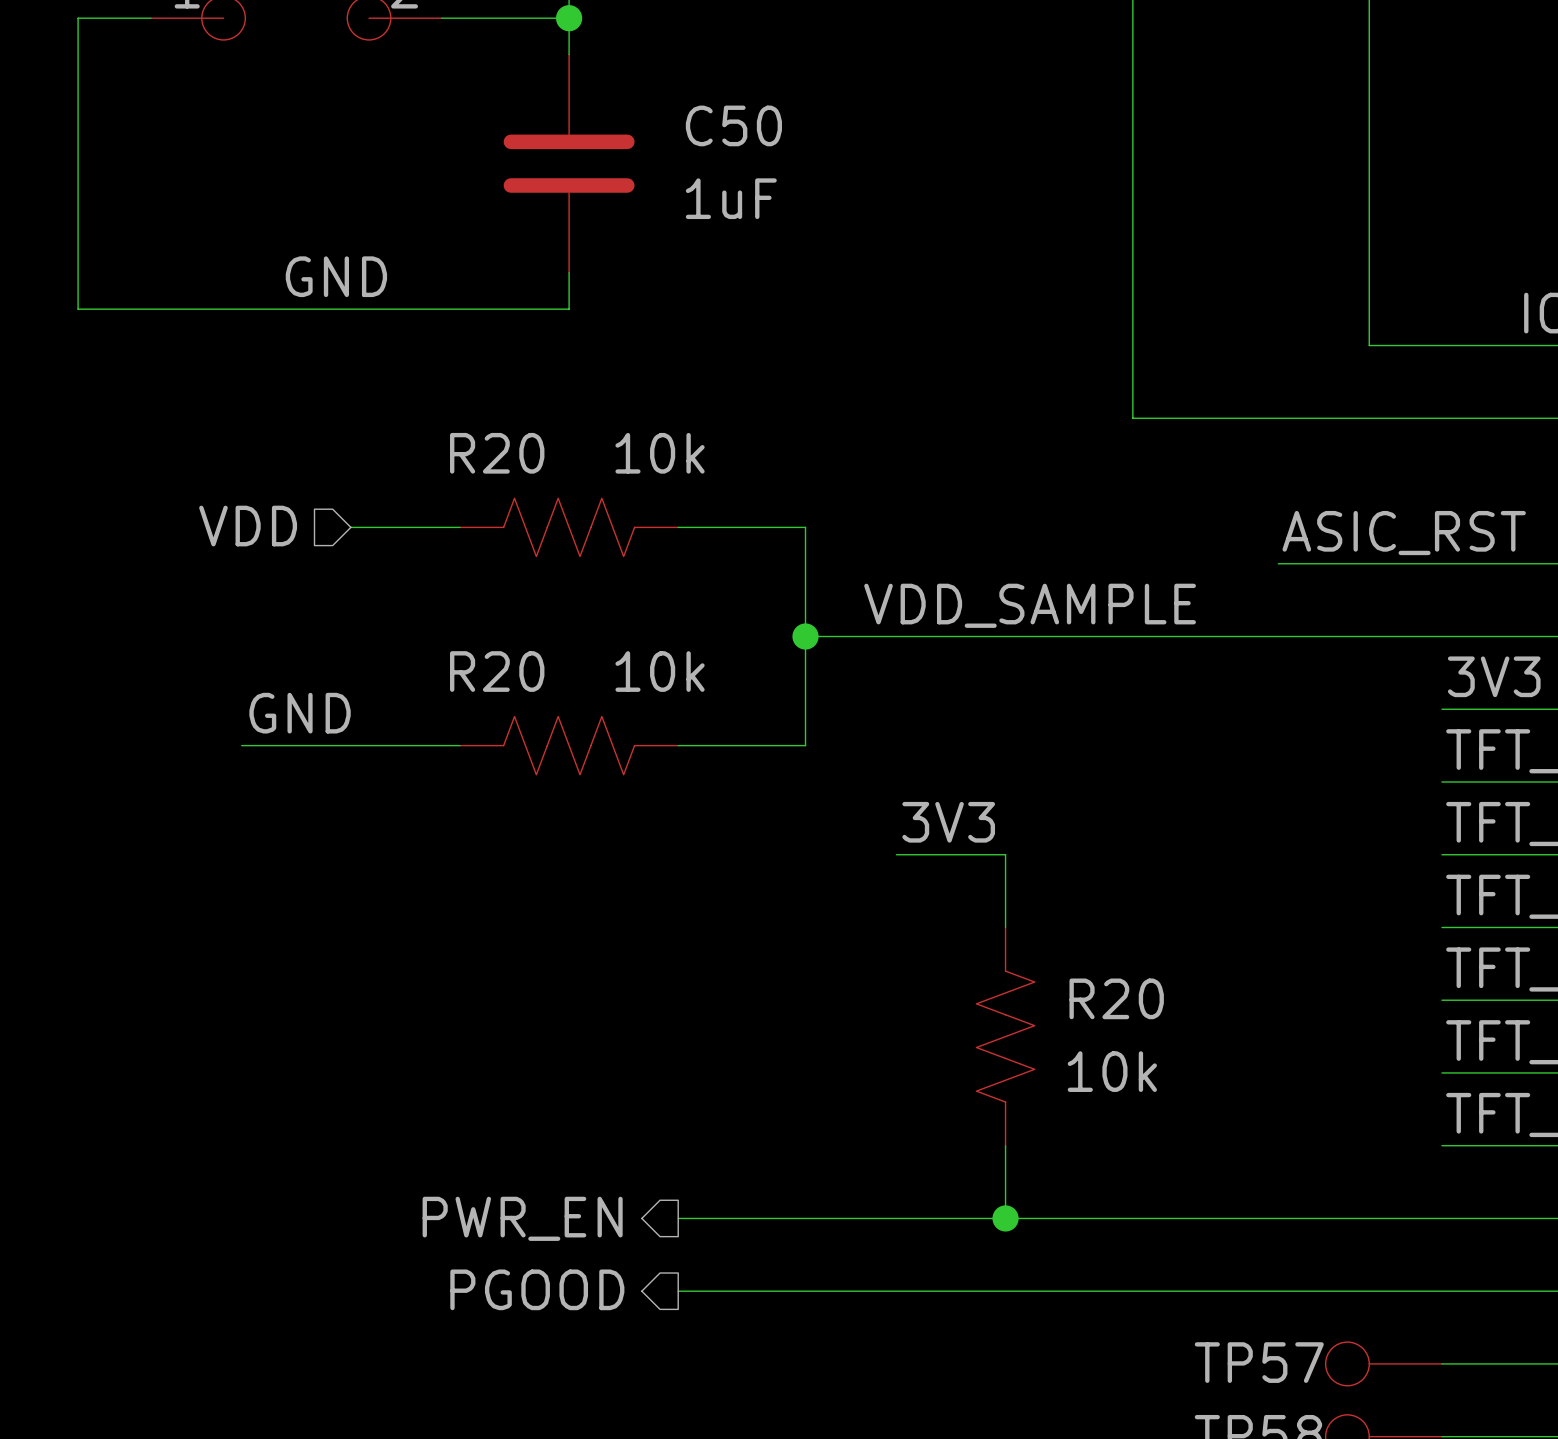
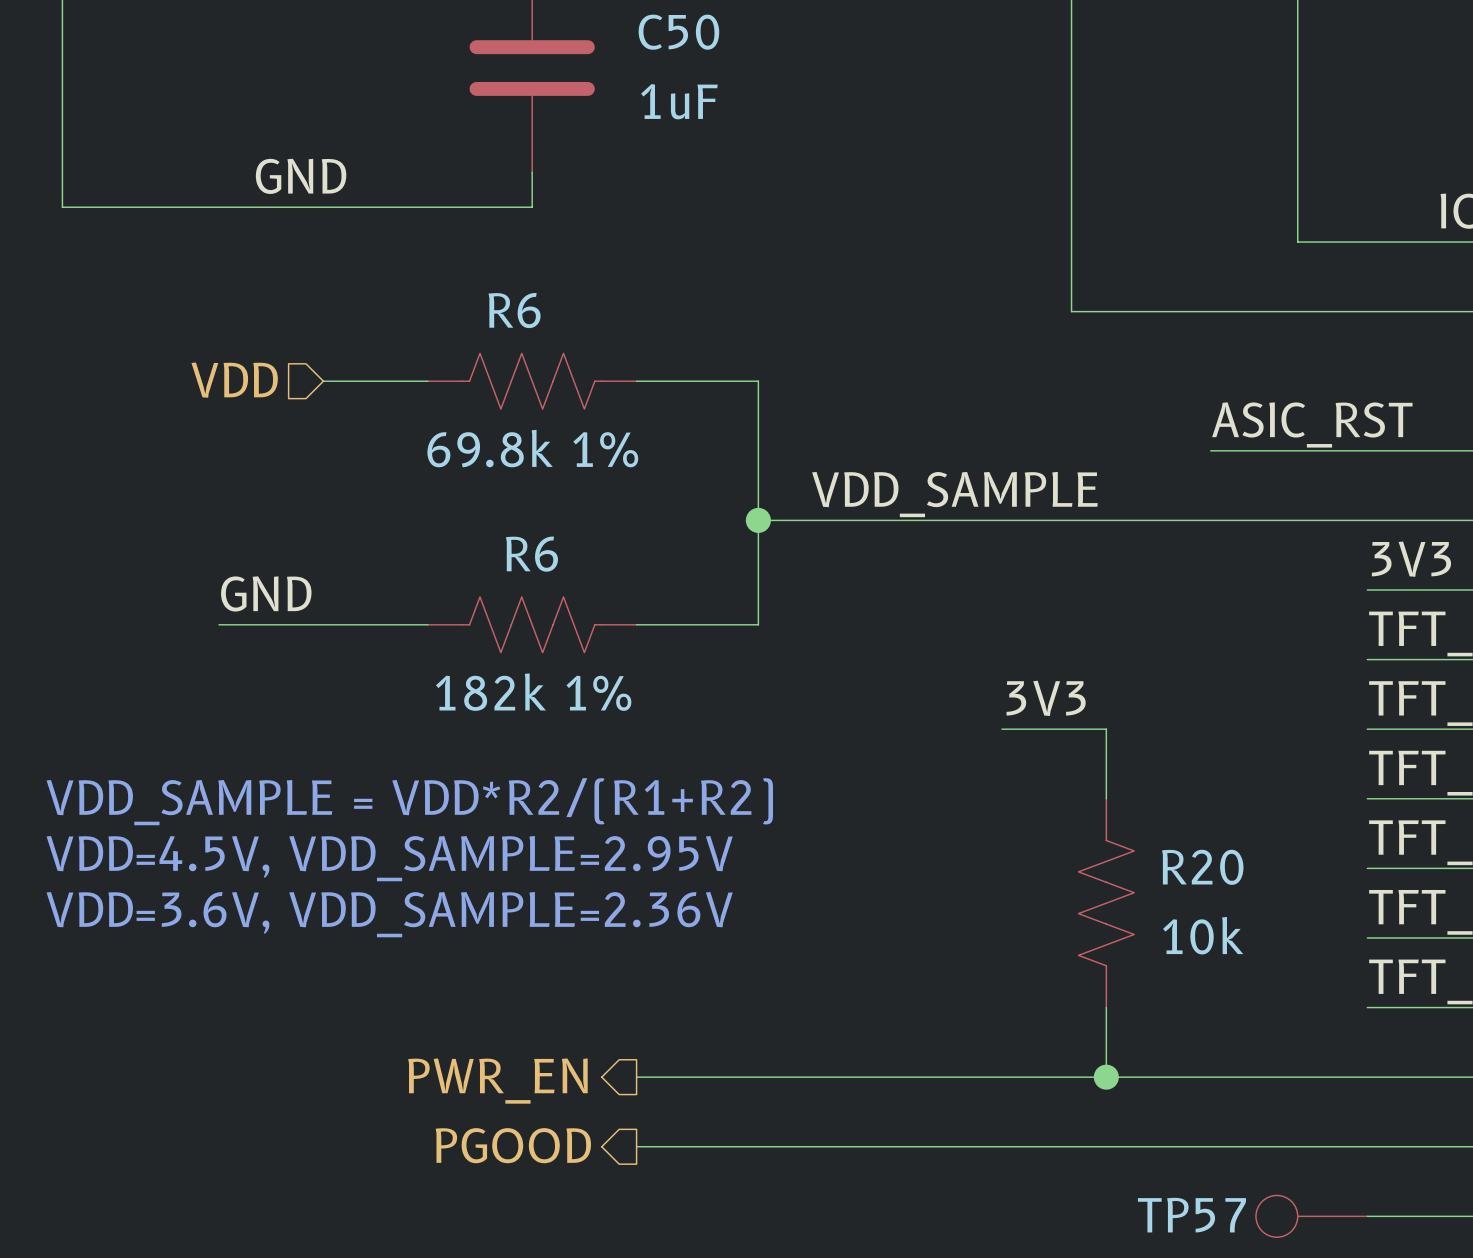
R6: none -> 69.8k 1% (532, 381)
hierarchical label position: VDD (248, 526) -> VDD (234, 380)
wire: (350, 527) (459, 527) -> (323, 381) (427, 381)
R20: 10k (569, 527) -> none
wire: (678, 527) (805, 527) -> (636, 381) (758, 381) (758, 416)
R20 name: R20 (497, 671) -> R6 (531, 554)
R20 value: 10k (660, 671) -> 182k 1% (533, 692)
label position: 3V3 (948, 822) -> 3V3 (1046, 698)
wire: (896, 854) (1005, 854) (1005, 927) -> (1001, 729) (1106, 729) (1106, 798)
text: none -> VDD_SAMPLE = VDD*R2/(R1+R2) (409, 801)
text: none -> VDD=4.5V, VDD_SAMPLE=2.95V (389, 858)
R20 position: (1005, 1036) -> (1106, 903)
text: none -> VDD=3.6V, VDD_SAMPLE=2.36V (389, 914)
wire: (1005, 1145) (1005, 1218) -> (1106, 1007) (1106, 1077)
junction position: (1005, 1218) -> (1106, 1077)

